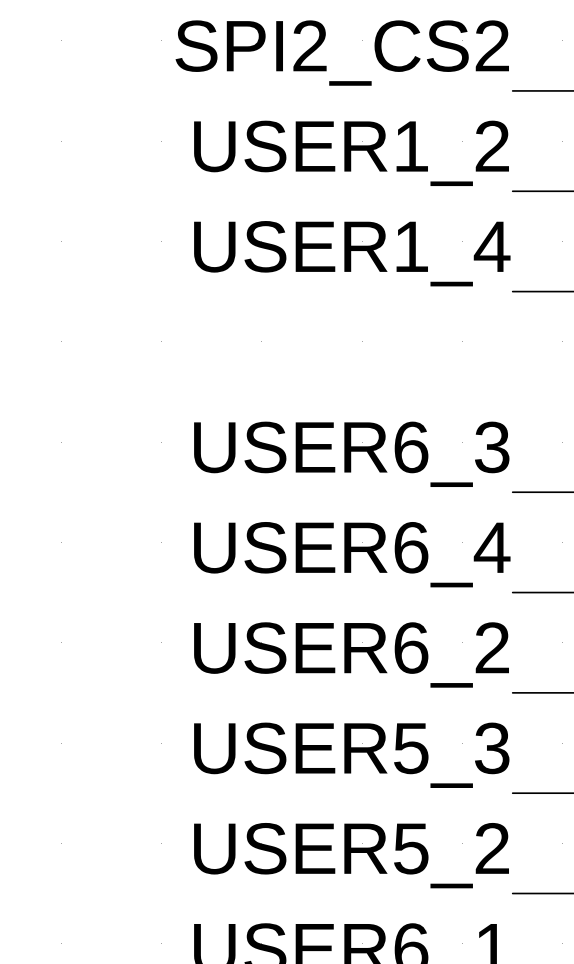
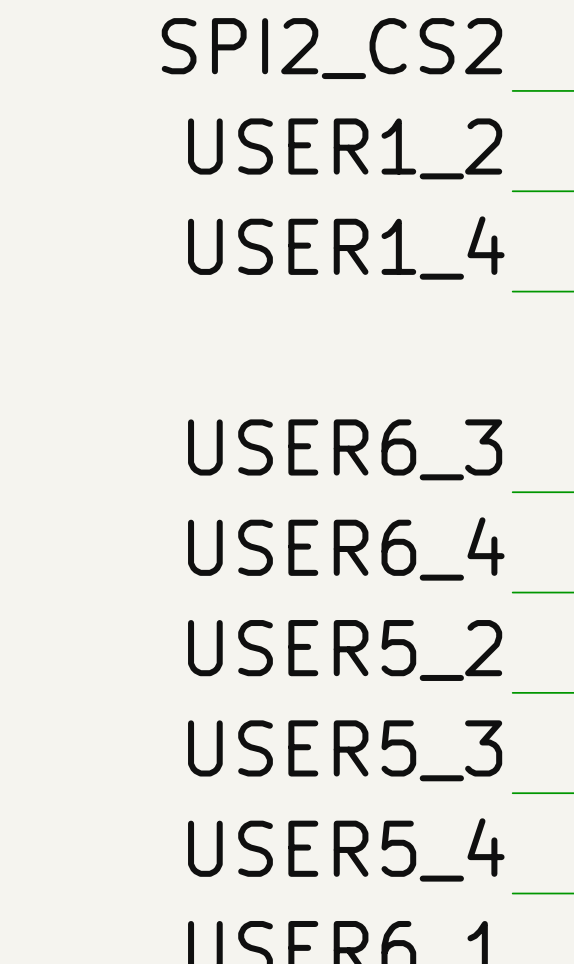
label: USER6_2 (351, 654) -> USER5_2 (345, 650)
label: USER5_2 (351, 855) -> USER5_4 (346, 849)

